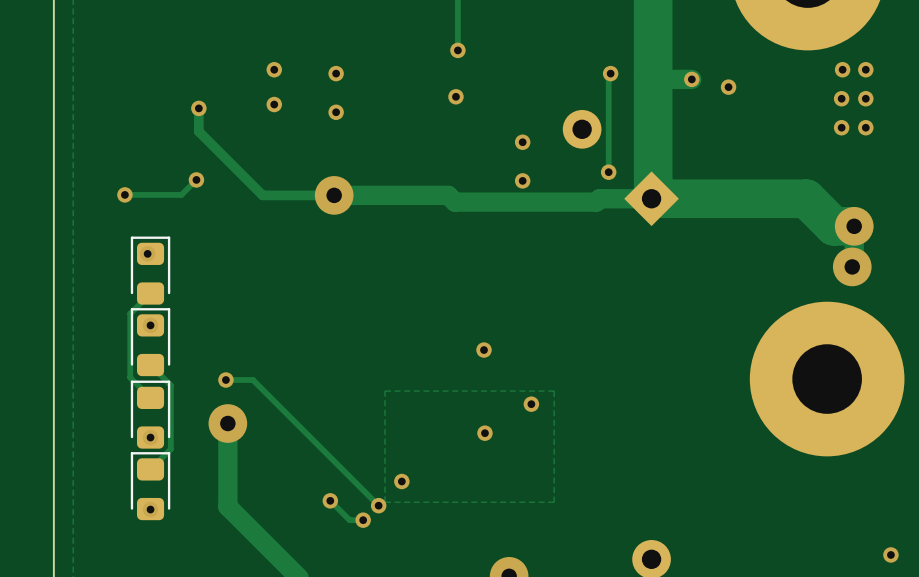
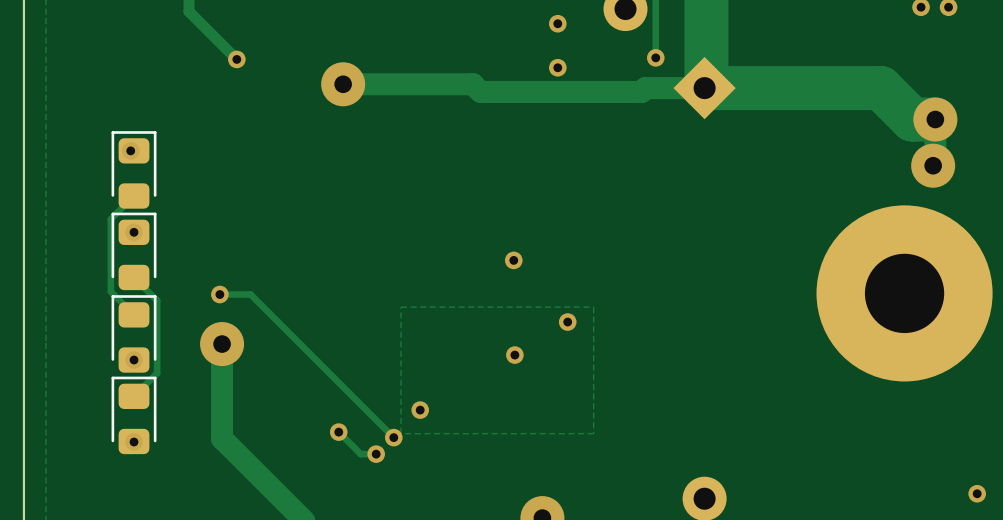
track: (240, 173) (262, 195) (334, 195) -> none
track: (196, 179) (181, 194) (124, 194) -> none
via position: (196, 179) -> (236, 59)
via: (124, 194) -> none

